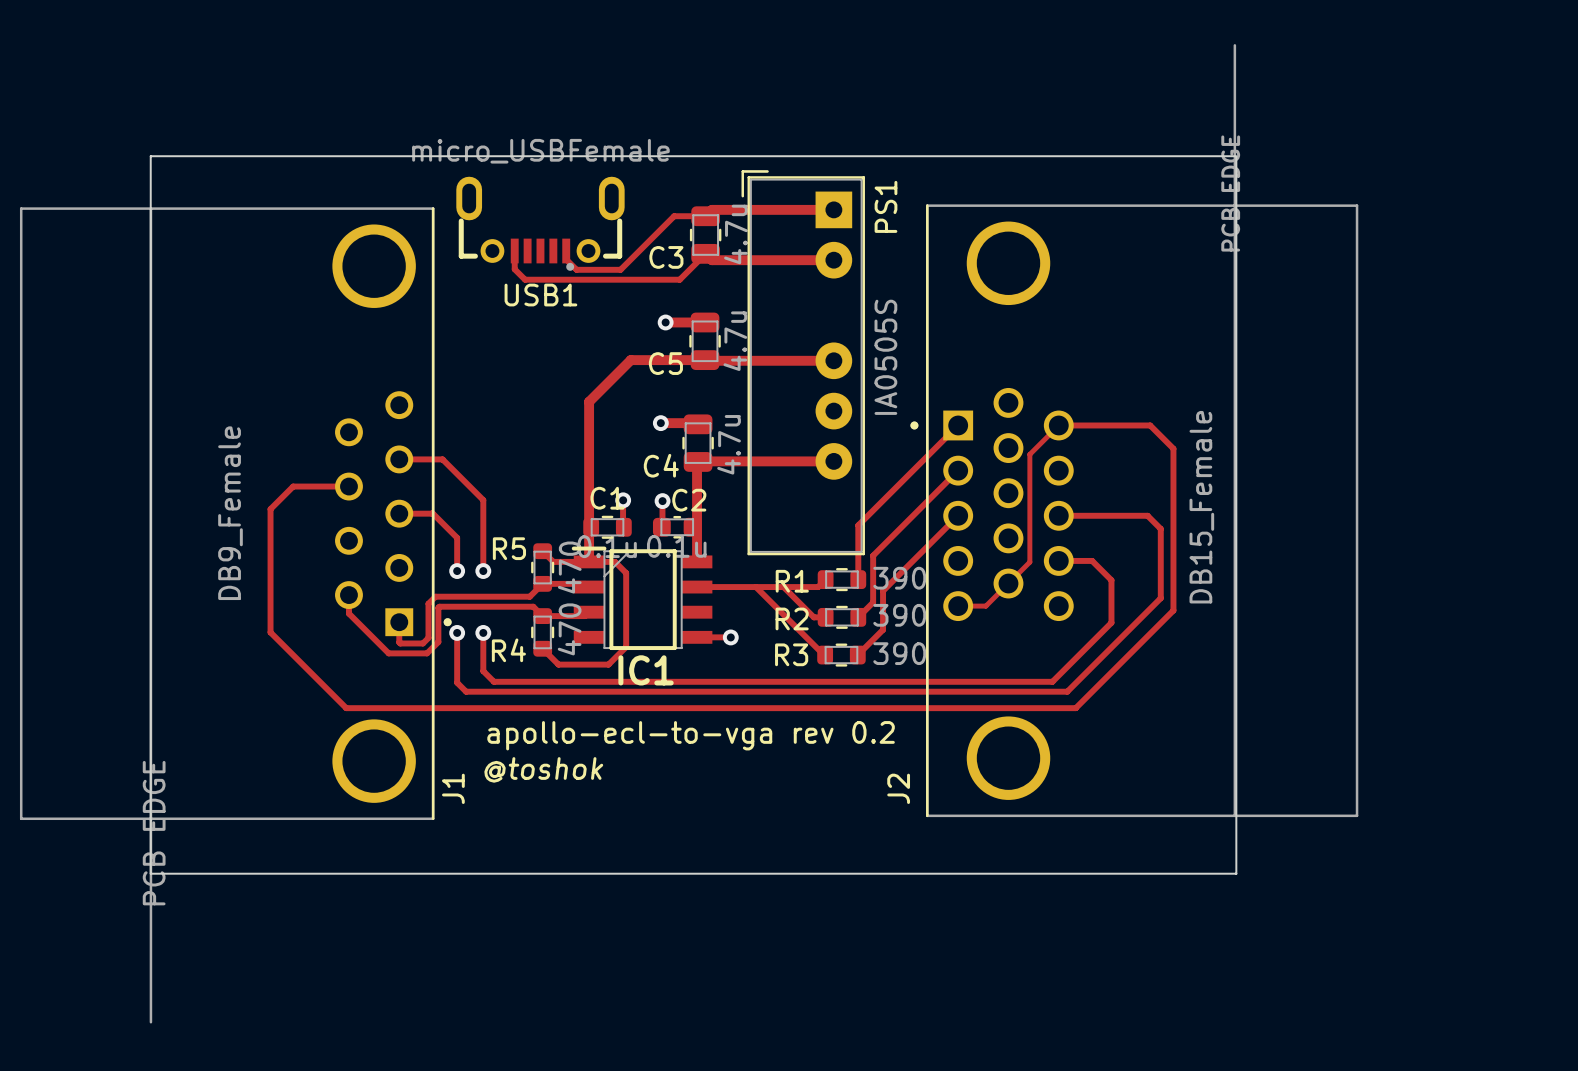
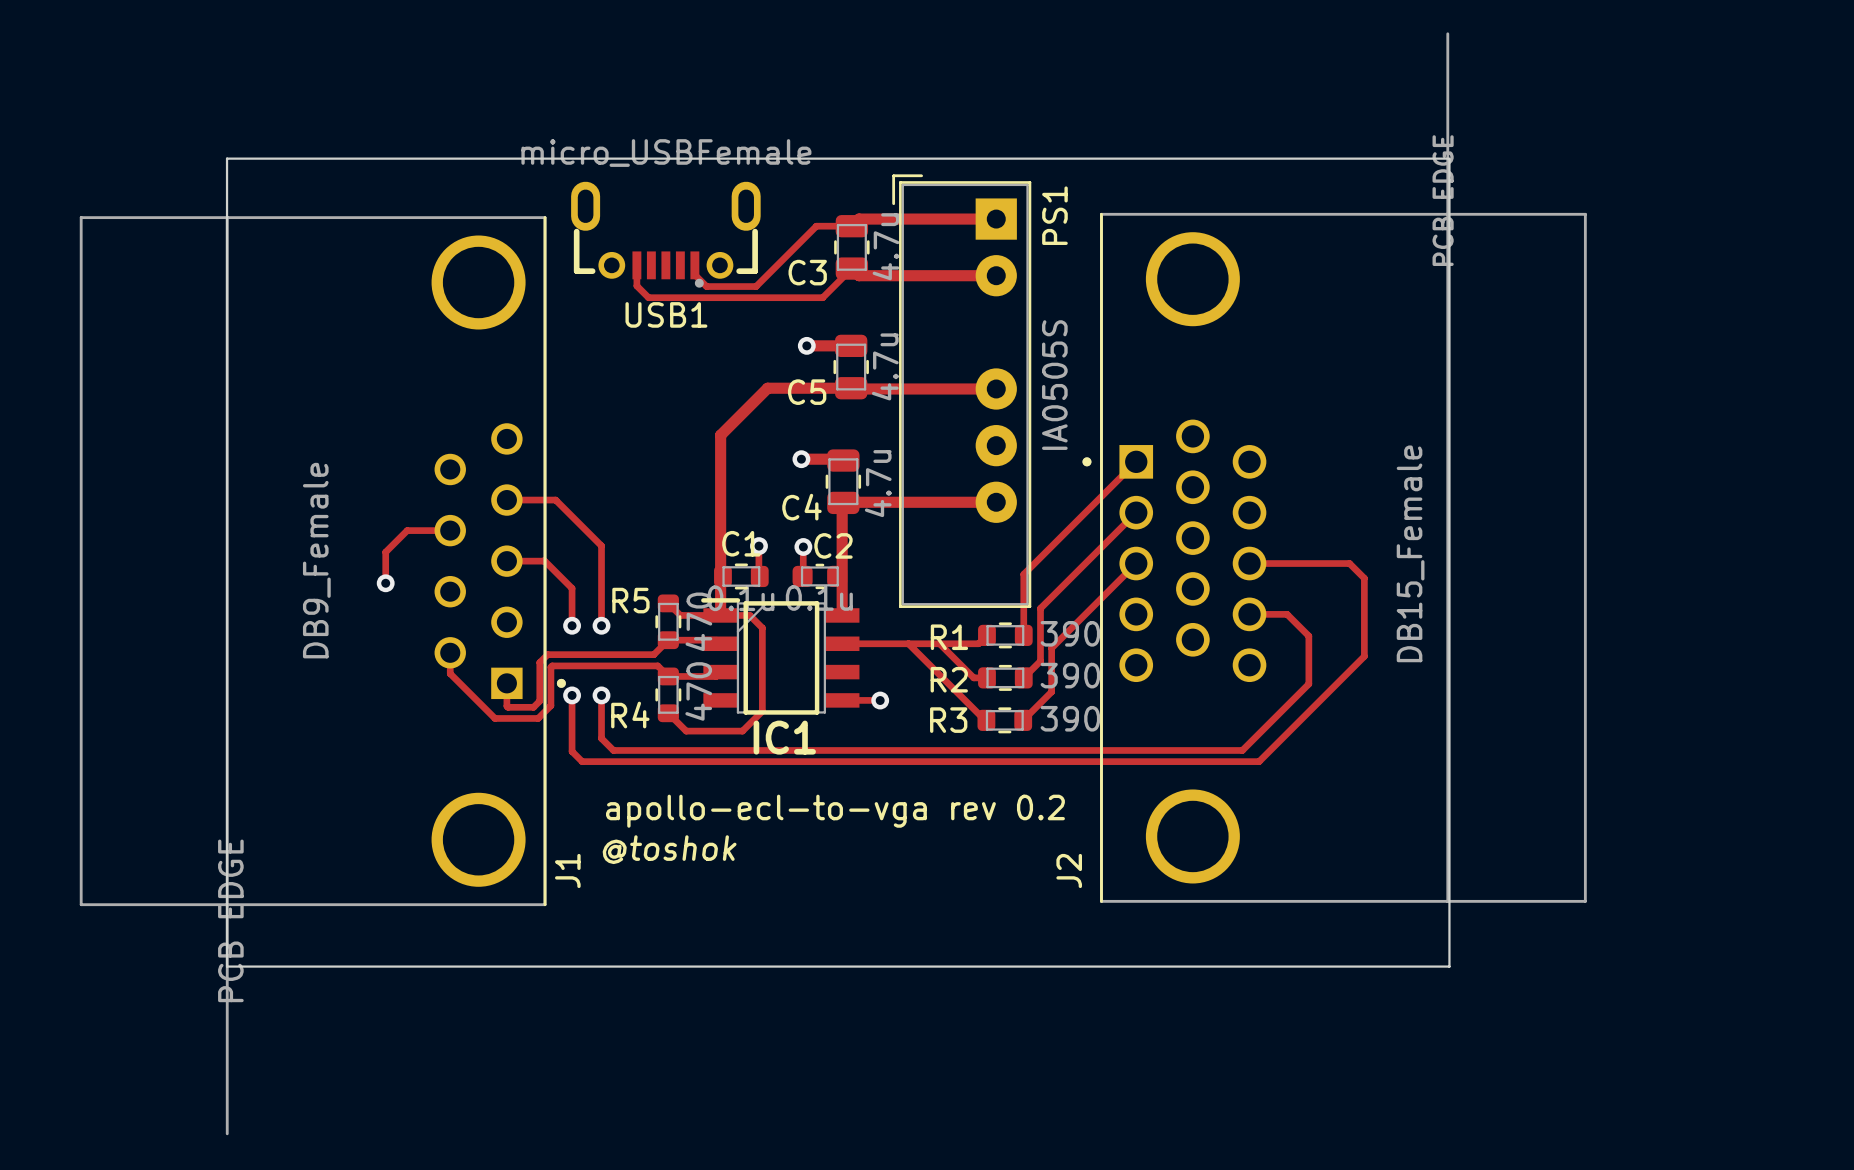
track: (1058, 425) (1029, 454) (1029, 562) (985, 606) (958, 606) -> none
track: (1059, 425) (1150, 425) (1173, 448) (1173, 610) (1075, 708) (346, 708) (270, 632) (270, 509) (293, 486) (310, 486) -> (385, 583) (385, 552) (407, 530)
via: none -> (385, 583)

